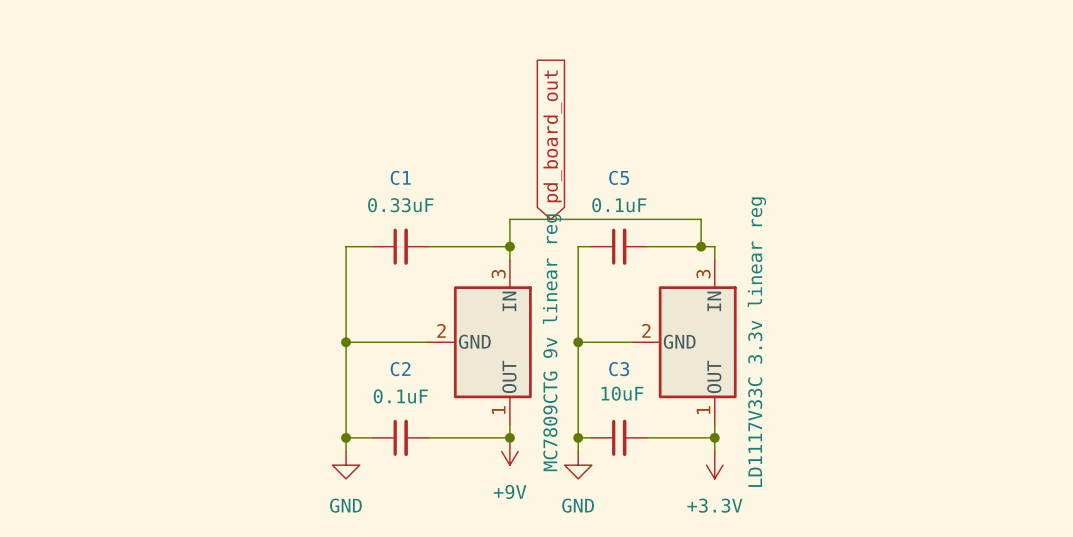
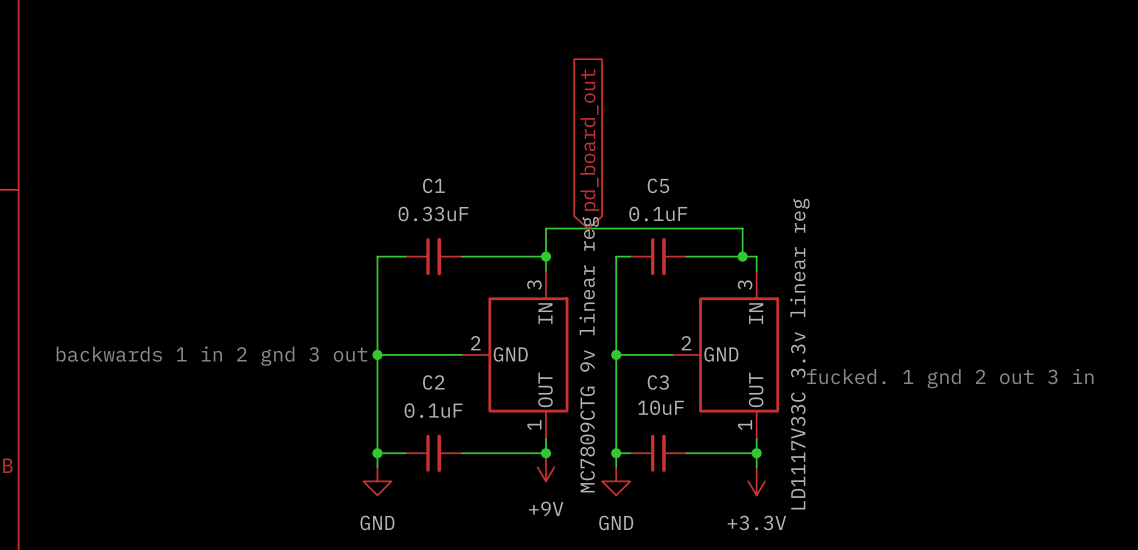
text: none -> backwards 1 in 2 gnd 3 out (211, 356)
text: none -> fucked. 1 gnd 2 out 3 in (950, 378)

